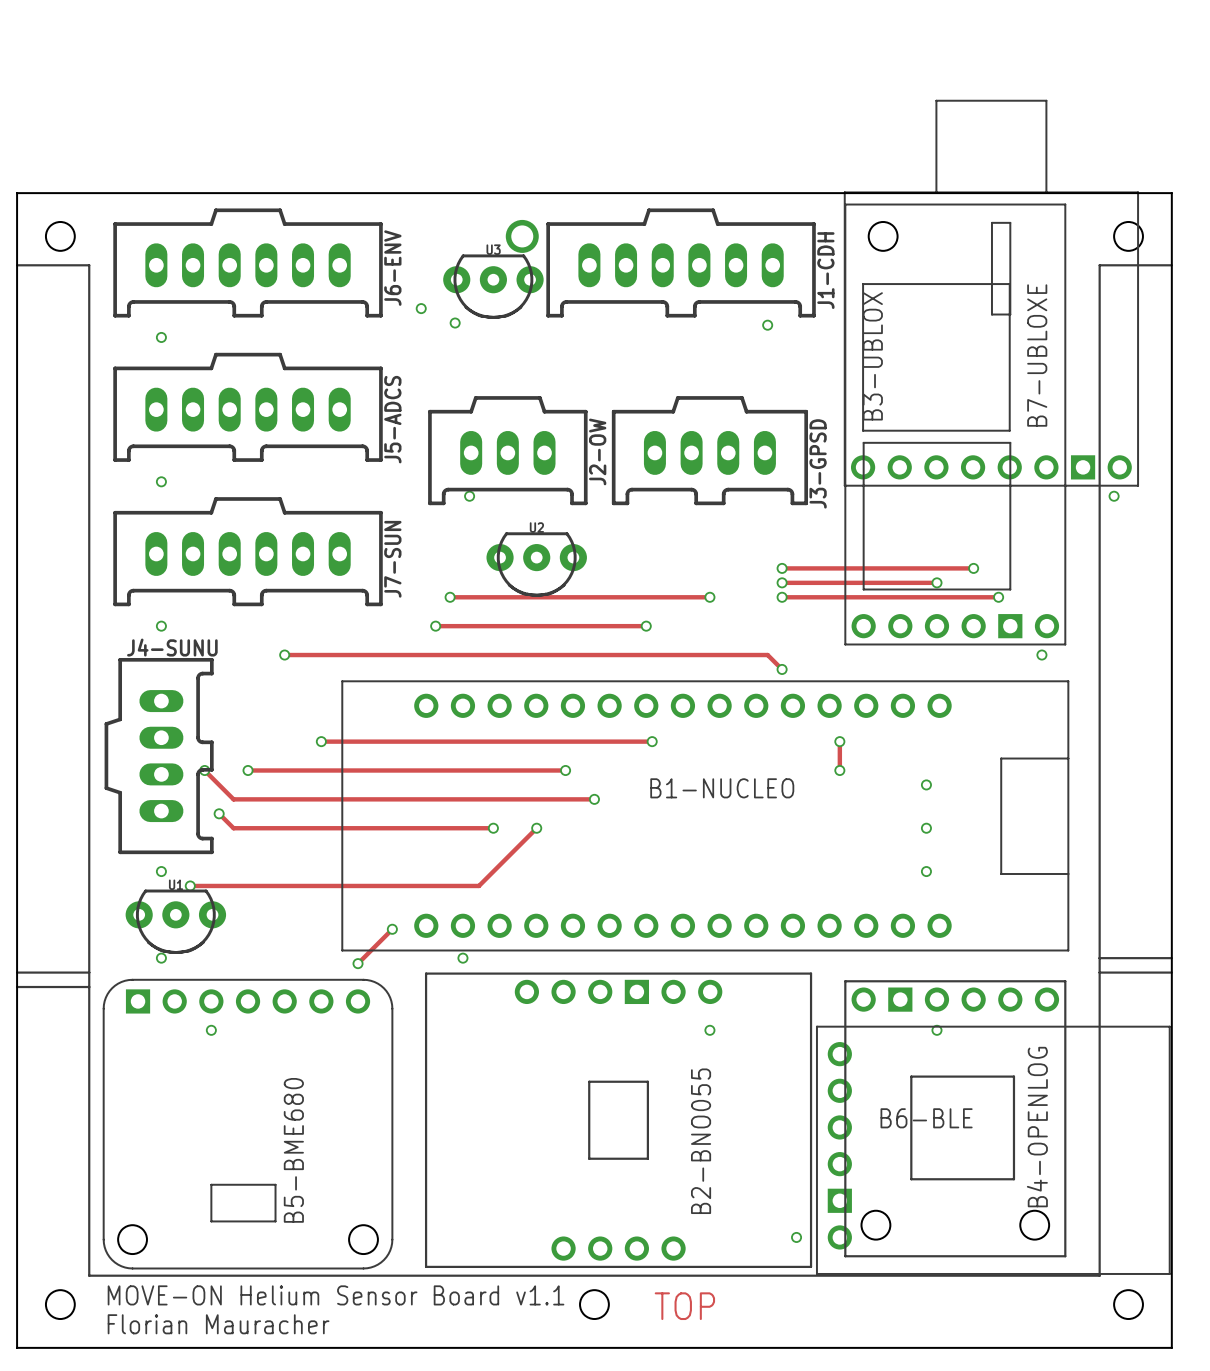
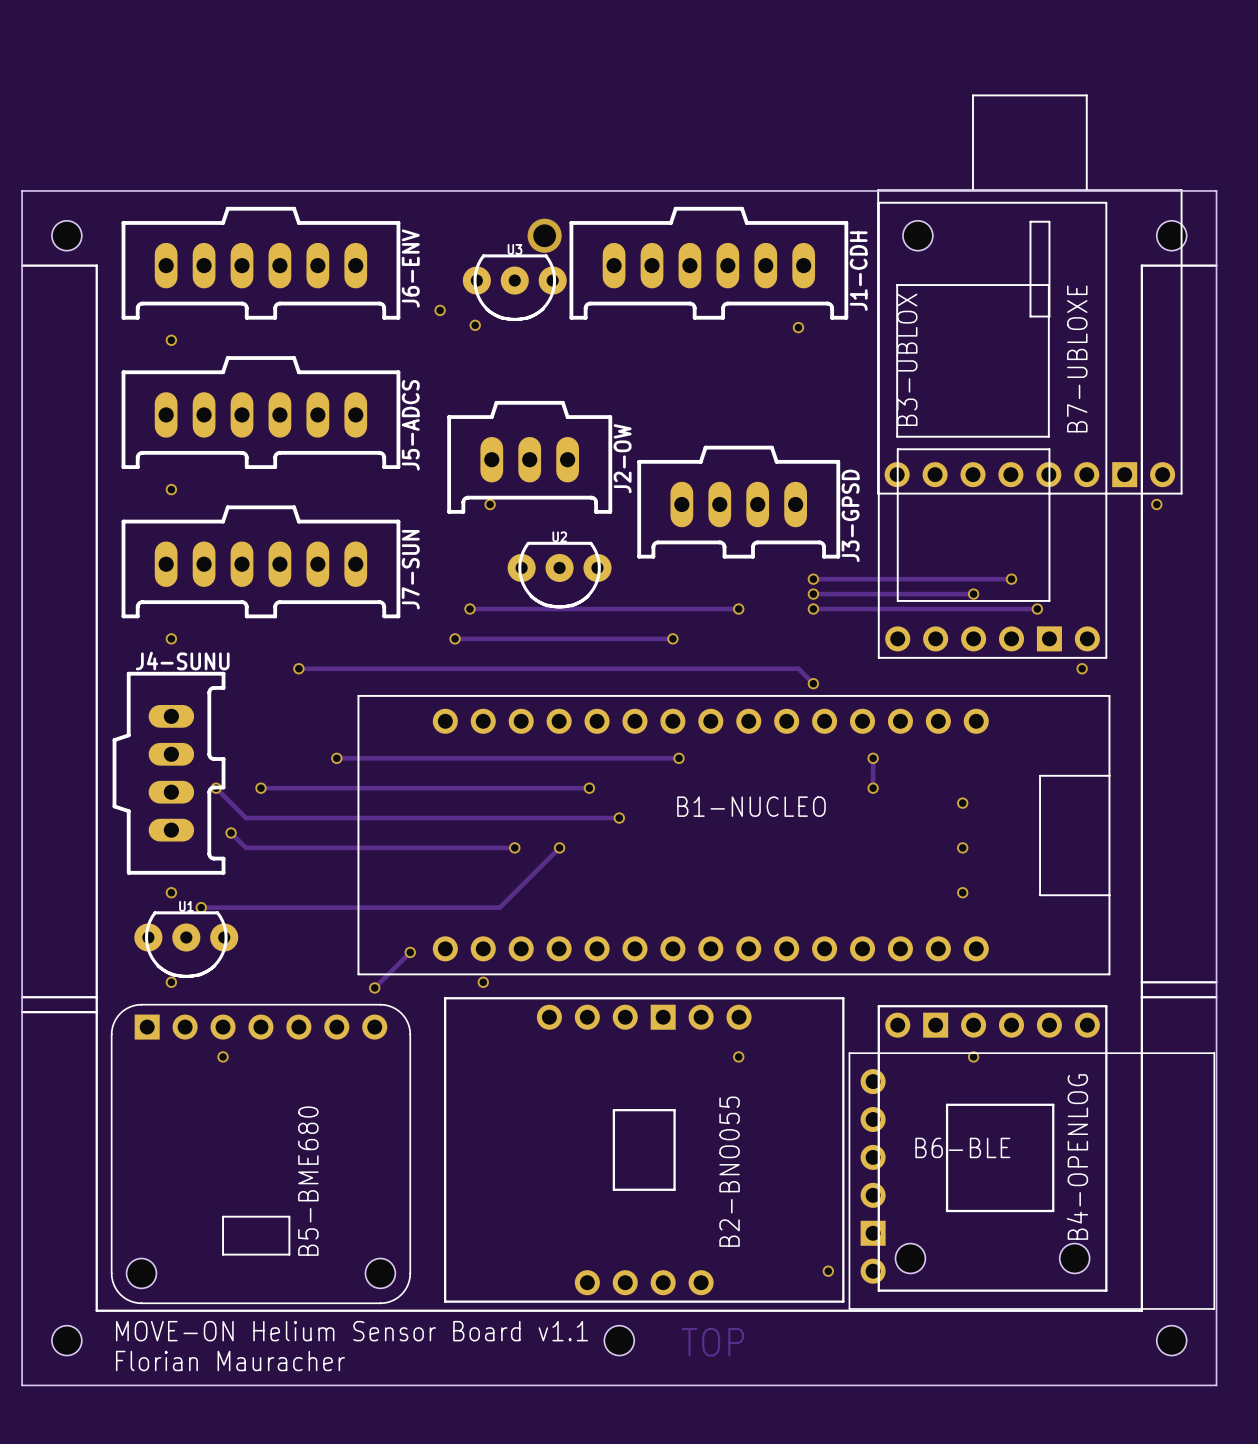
J3-GPSD position: (709, 450) -> (738, 502)

